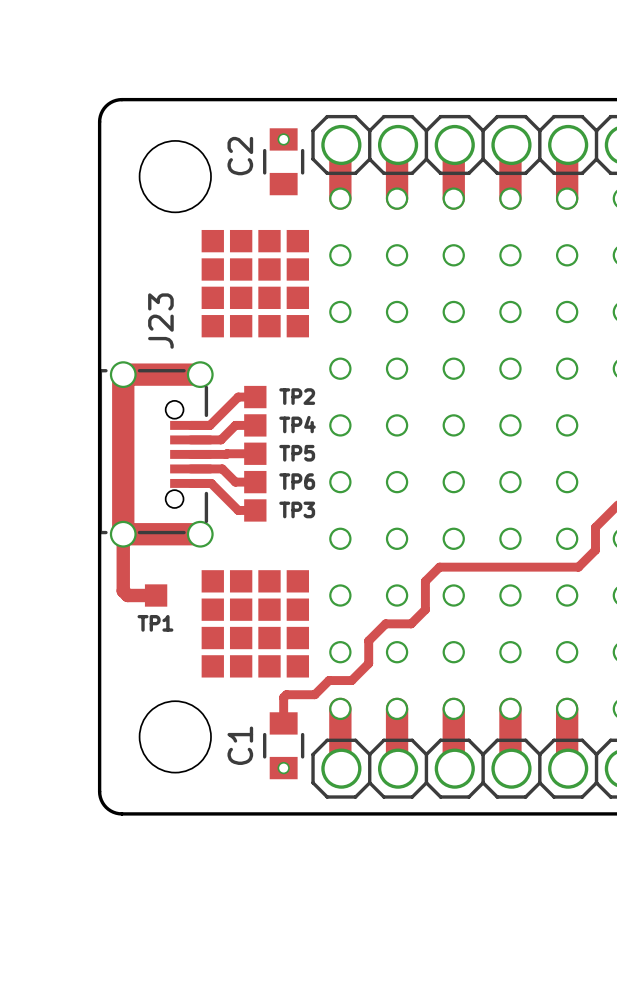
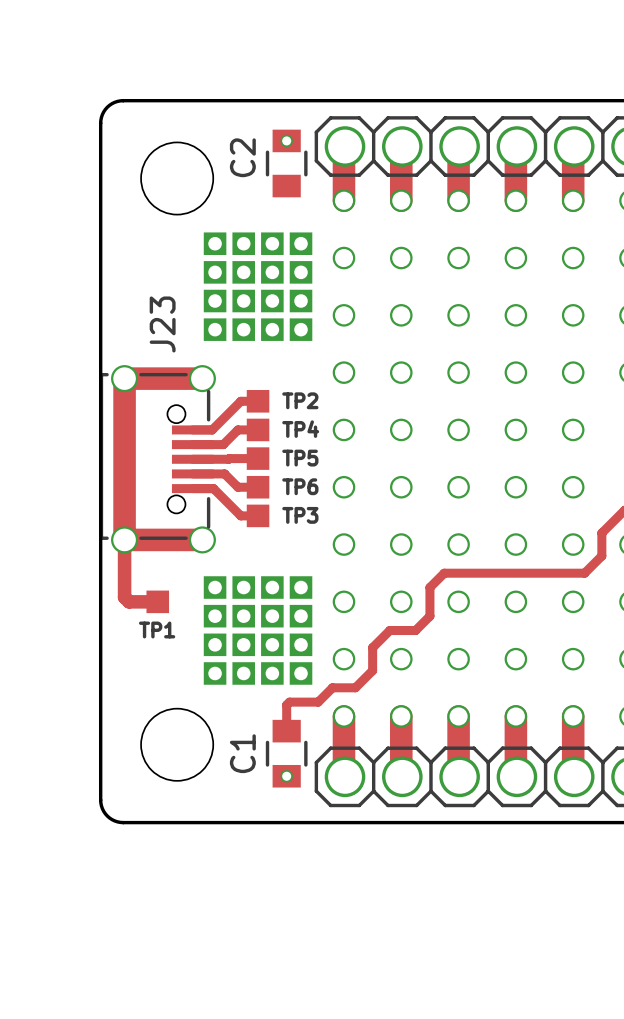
part footprint: [201, 229, 310, 338] -> [203, 232, 313, 341]
part footprint: [201, 570, 310, 678] -> [203, 576, 313, 685]

